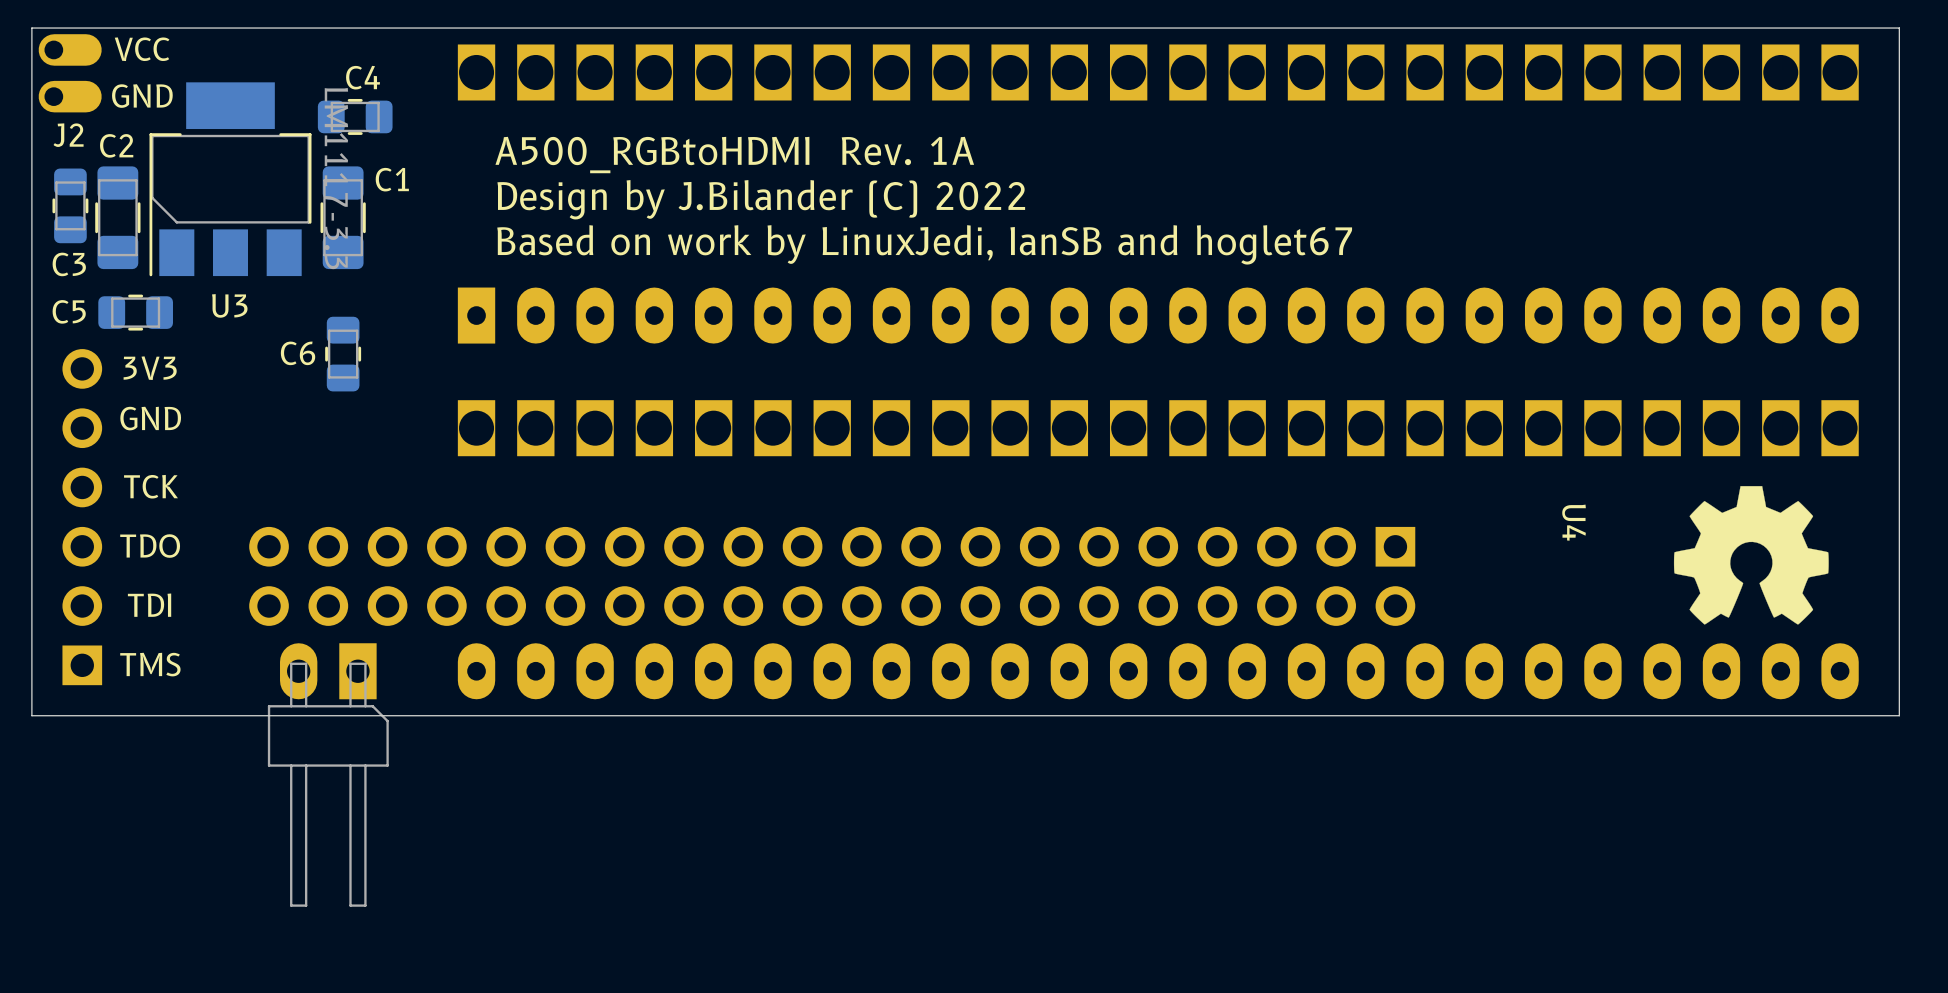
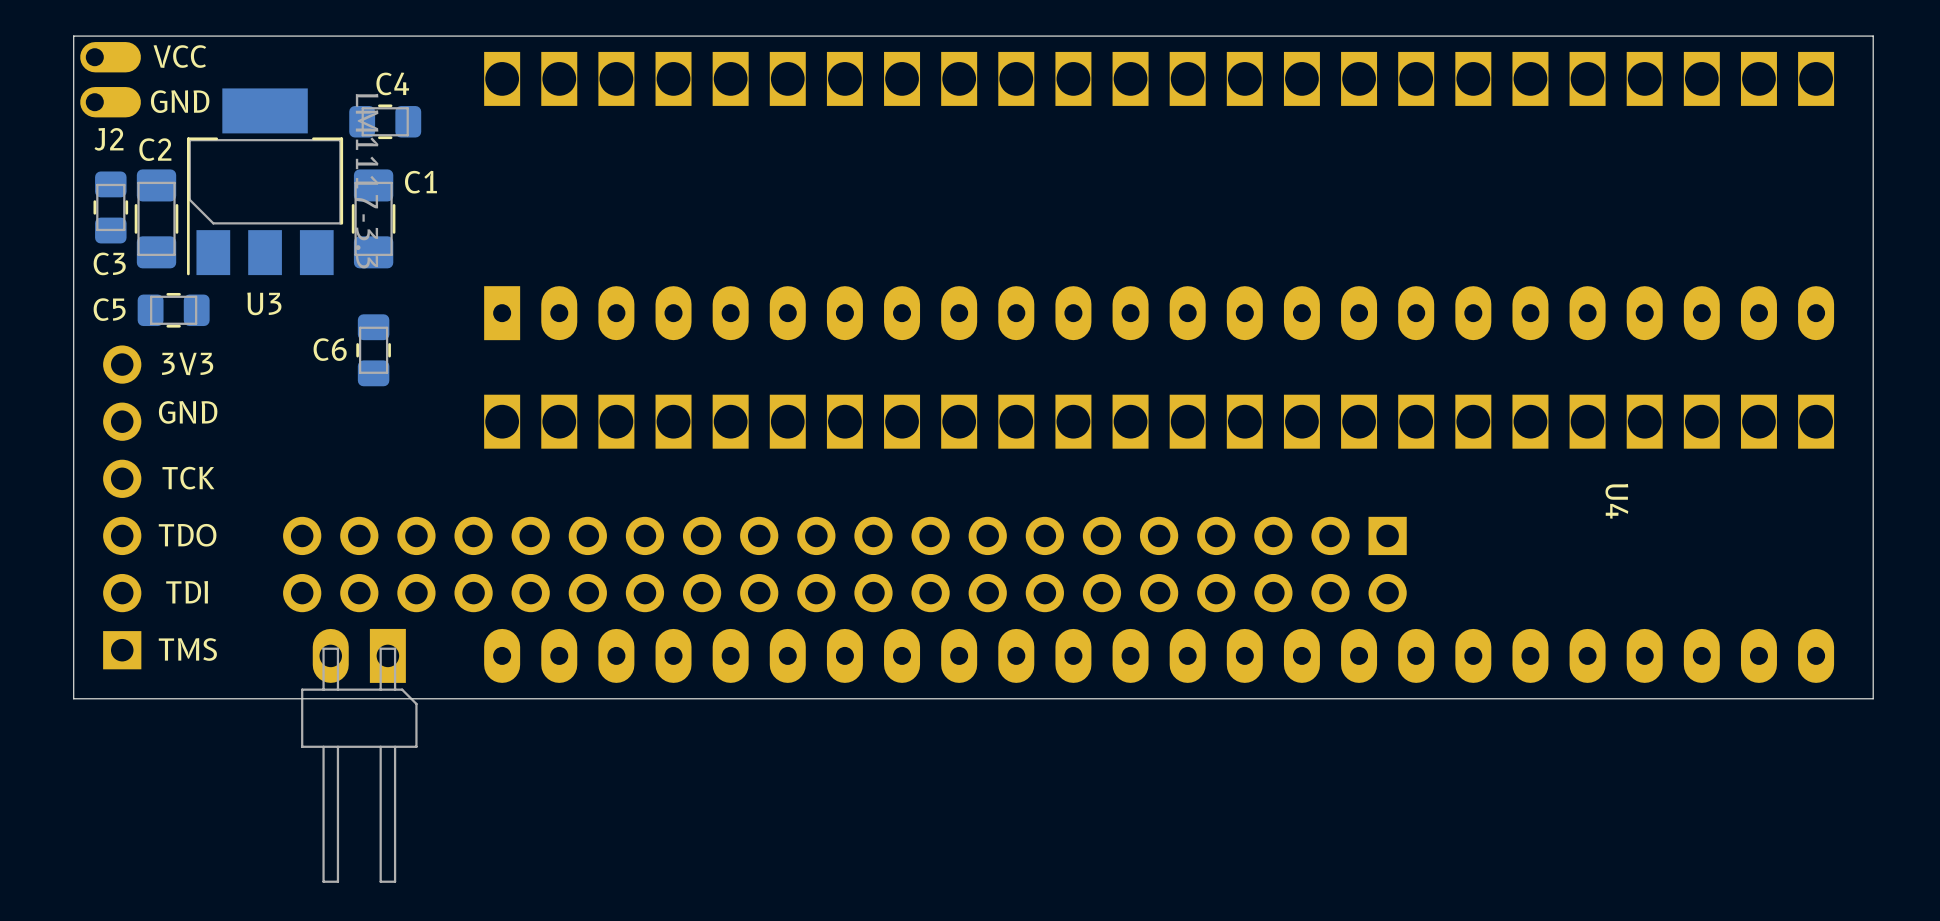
text: A500_RGBtoHDMI Rev. 1A (734, 155) -> none
text: Design by J.Bilander (C) 2022 (761, 199) -> none
text: Based on work by LinuxJedi, IanSB and hoglet67 (924, 244) -> none
drawing: [1673, 486, 1829, 625] -> none
U4 name position: U4 (1574, 522) -> U4 (1616, 501)

